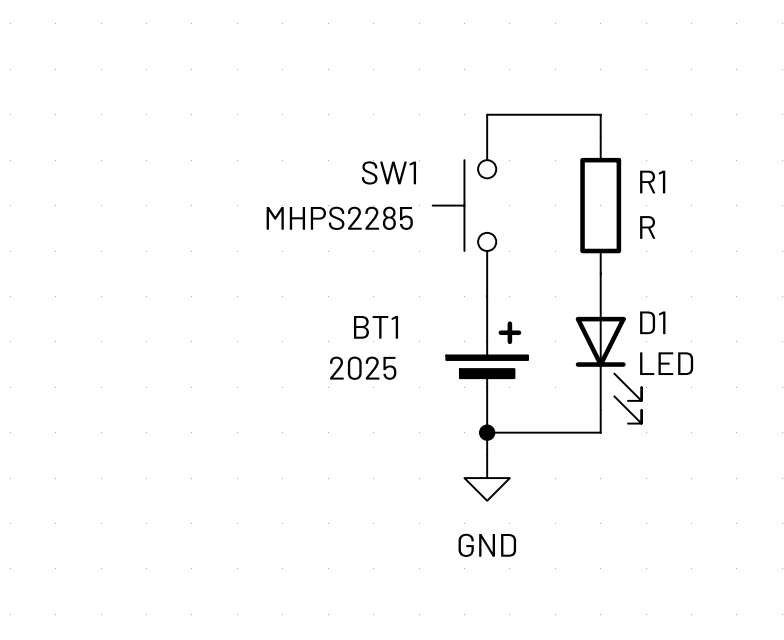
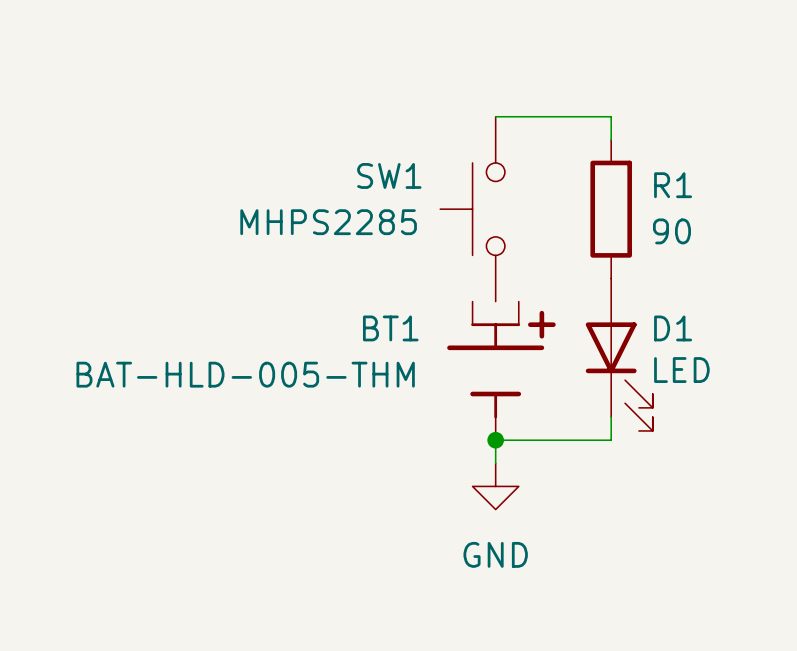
R1 value: R (647, 227) -> 90 (671, 231)
BT1 symbol: [446, 296, 529, 433] -> [447, 301, 556, 441]
BT1 value: 2025 (363, 368) -> BAT-HLD-005-THM (245, 374)

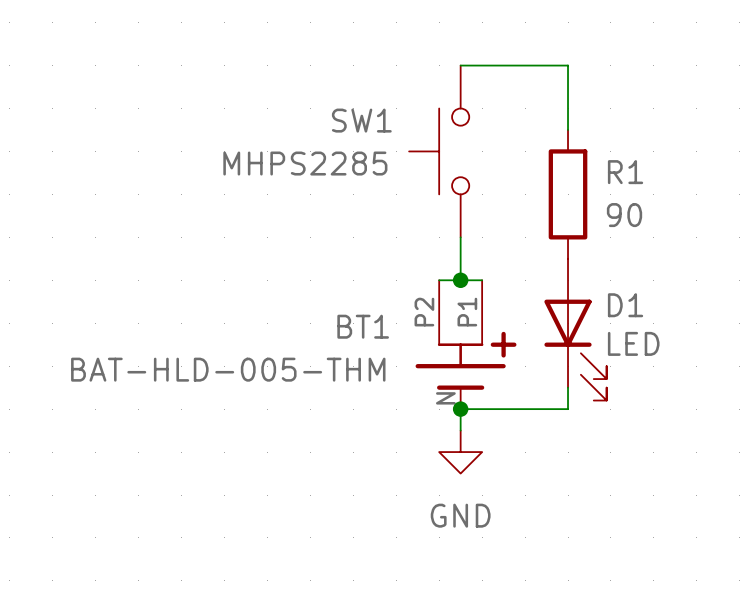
wire: (495, 116) (611, 116) -> (460, 65) (568, 65) (568, 108)
SW1 position: (472, 209) -> (439, 151)
BT1 symbol: [447, 301, 556, 441] -> [415, 280, 517, 410]
wire: none -> (439, 280) (482, 280)
junction: none -> (460, 280)

